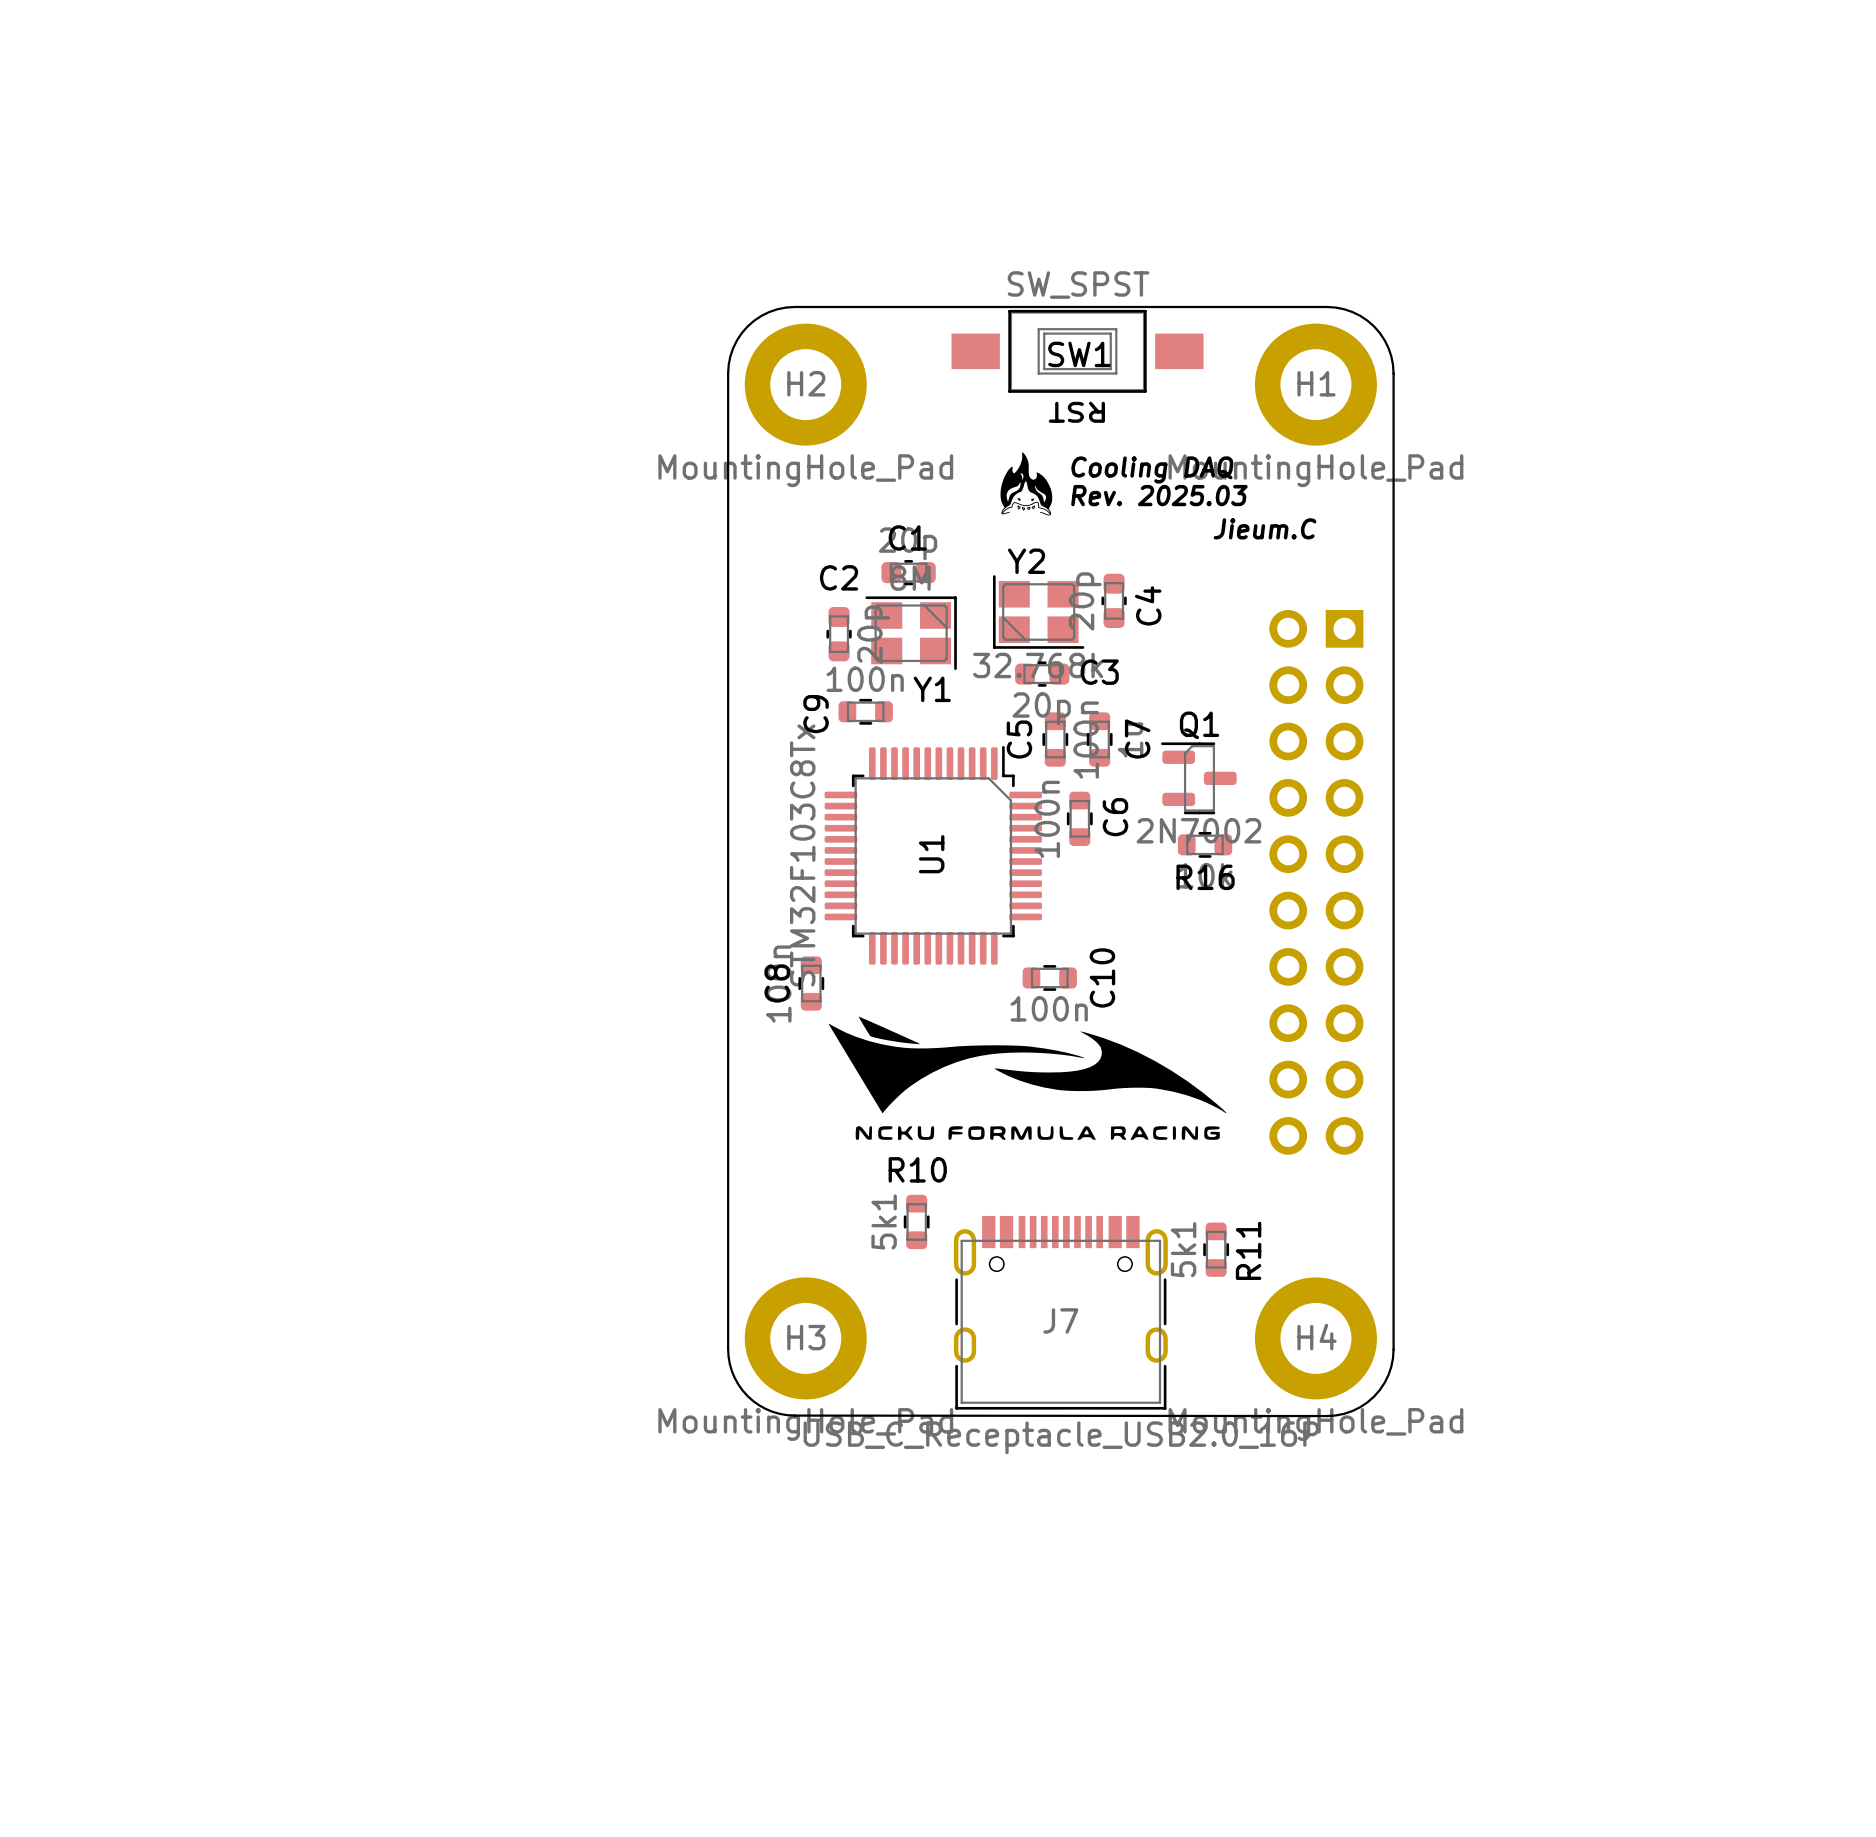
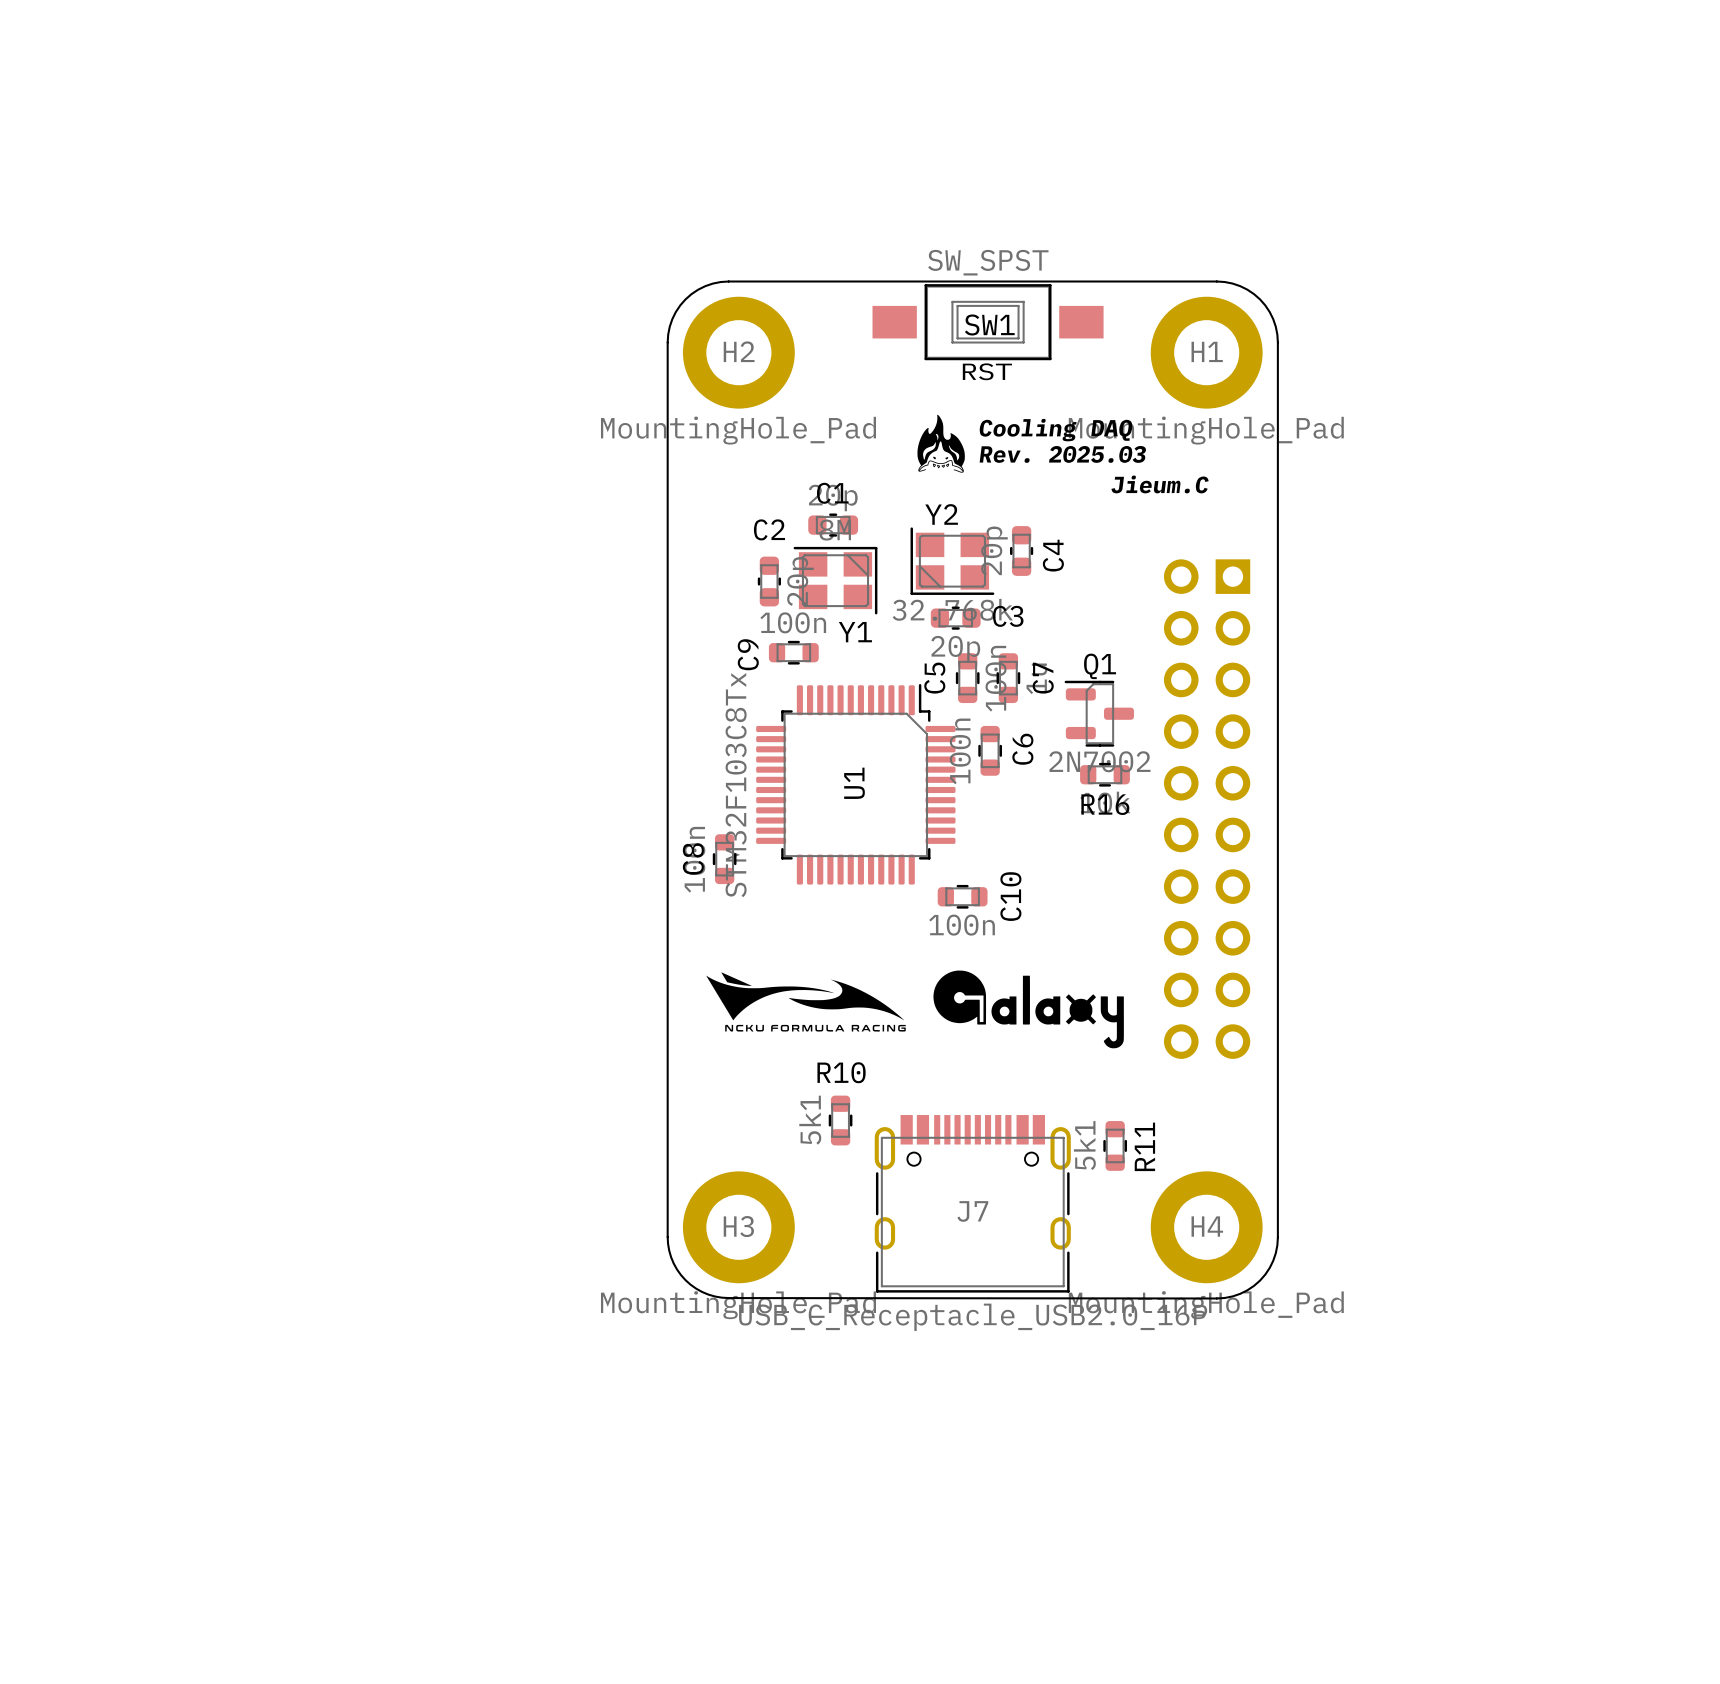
text rotation: 0° (1076, 412) -> 180° (987, 371)
C8 position: (811, 983) -> (724, 859)
drawing: [828, 1016, 1227, 1140] -> none
drawing: none -> [933, 970, 1124, 1049]
drawing: none -> [706, 972, 906, 1032]

